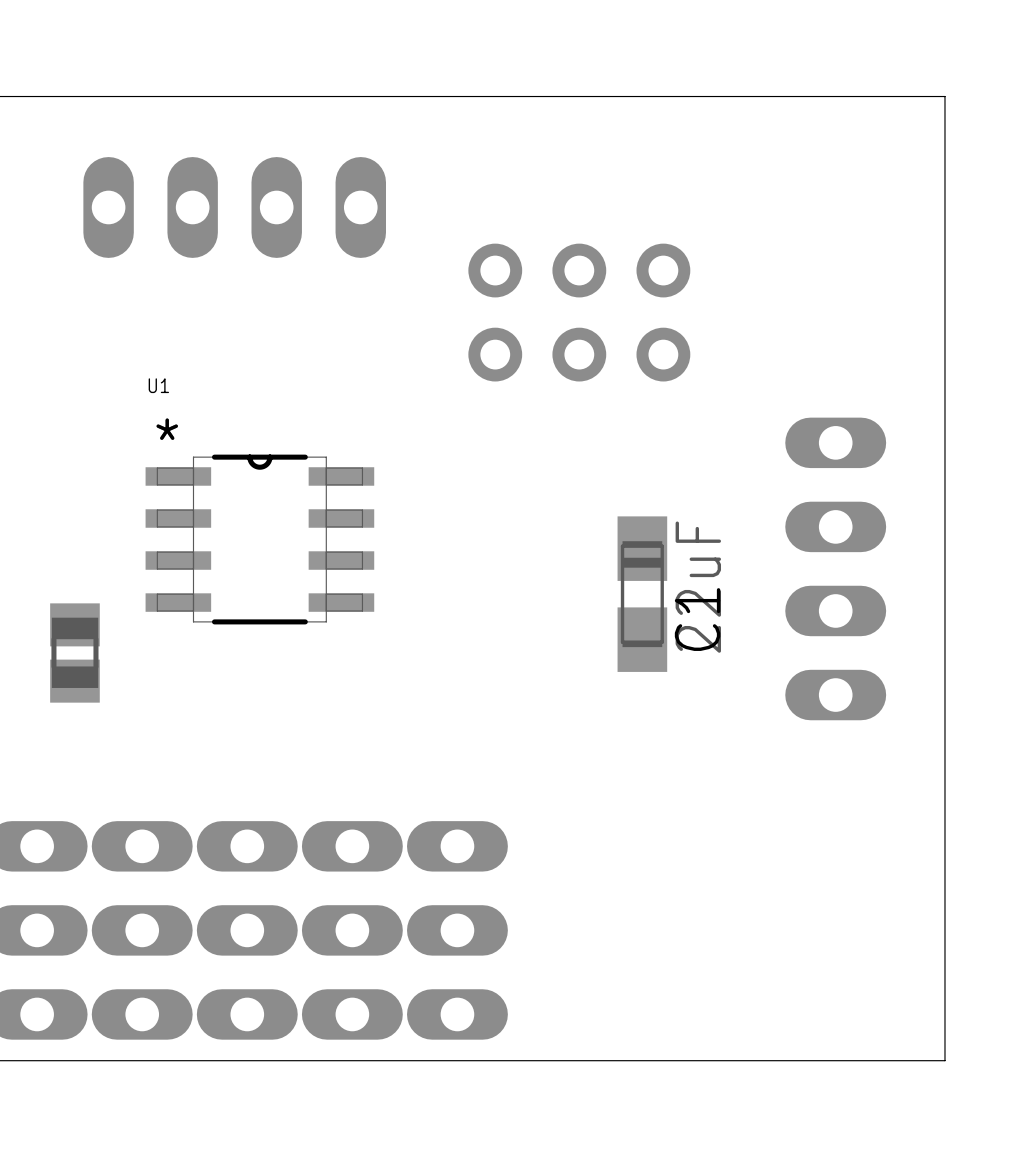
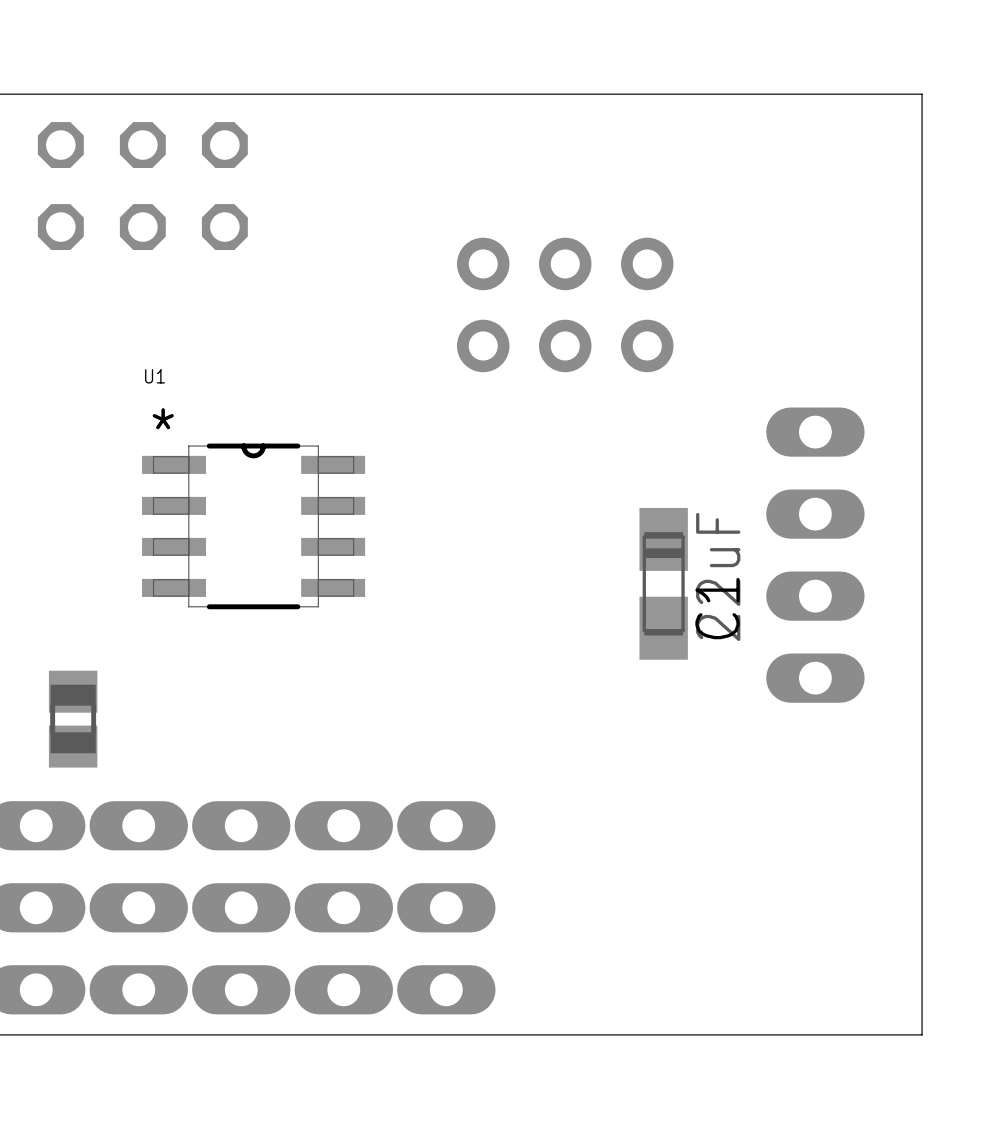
part: none -> (142, 186)
part: (234, 207) -> none
C1 position: (642, 594) -> (663, 583)
part position: (74, 653) -> (73, 719)

